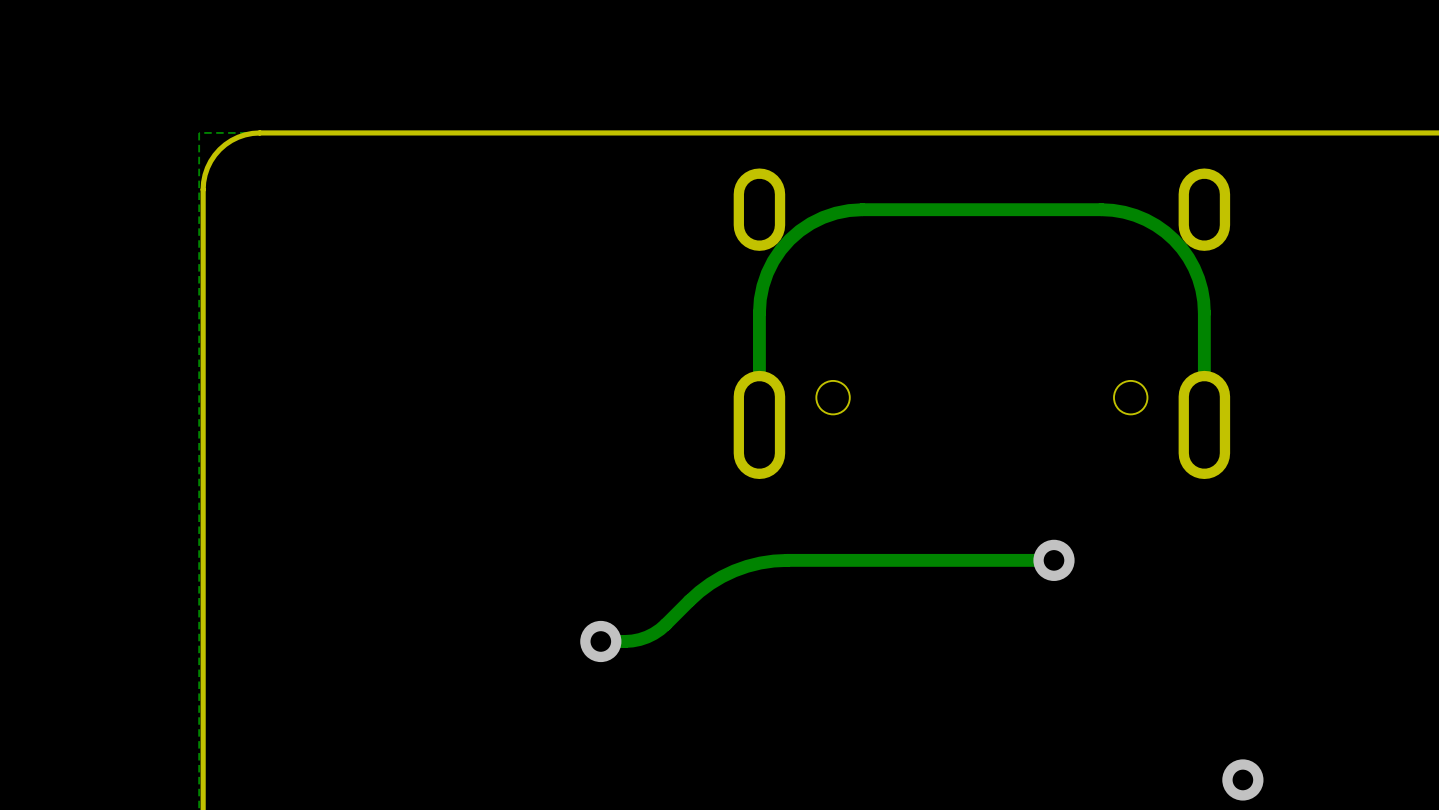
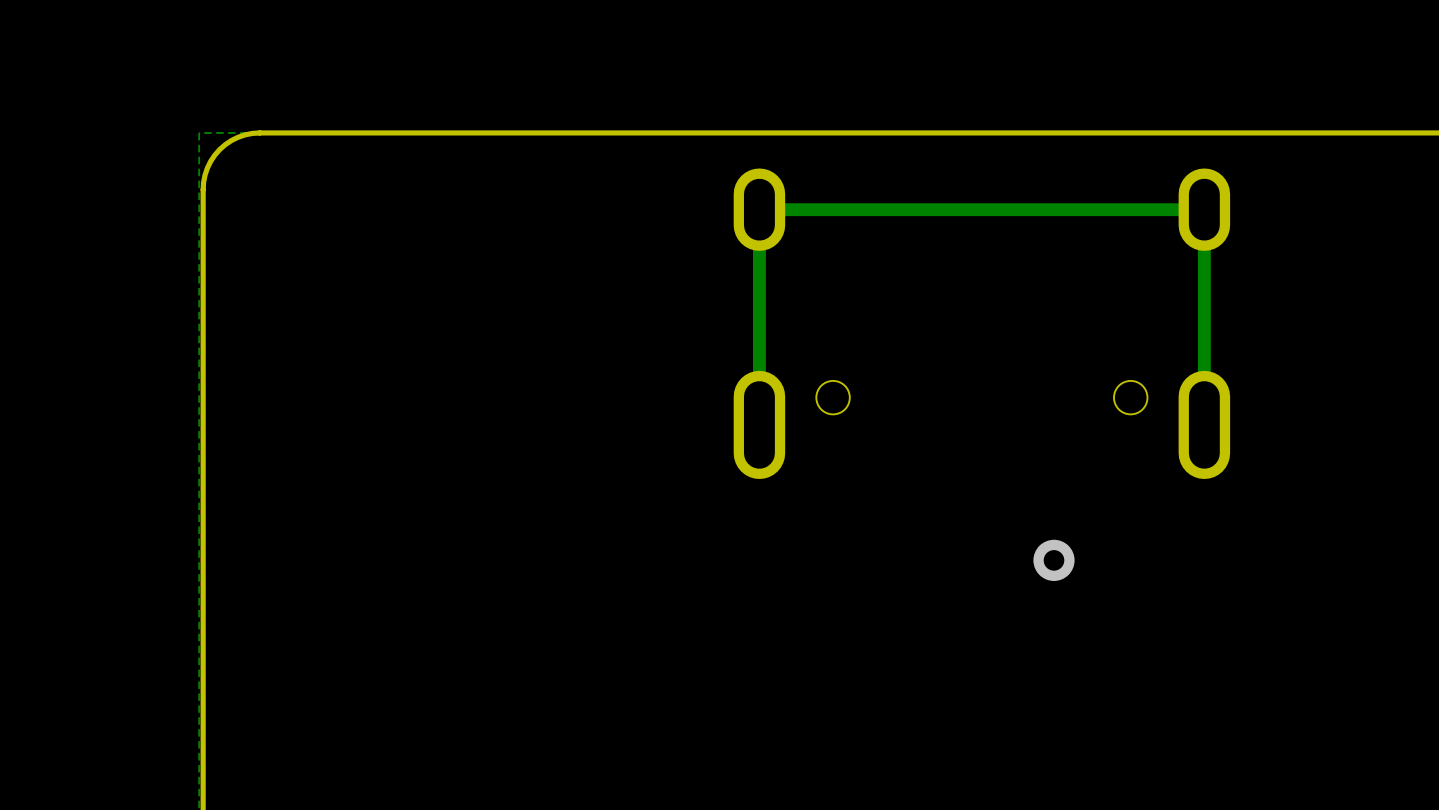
track: (862, 209) (835, 213) (823, 217) (799, 230) (789, 239) (780, 249) (767, 273) (762, 286) (759, 312) -> (862, 209) (759, 209) (759, 312)
track: (1101, 209) (1124, 212) (1146, 219) (1174, 239) (1188, 257) (1198, 278) (1204, 312) -> (1101, 209) (1204, 209) (1204, 312)
track: (1053, 560) (787, 560) (760, 563) (734, 570) (710, 583) (660, 629) (647, 637) (632, 640) (600, 641) -> none
via: (600, 641) -> none
via: (1242, 779) -> none

